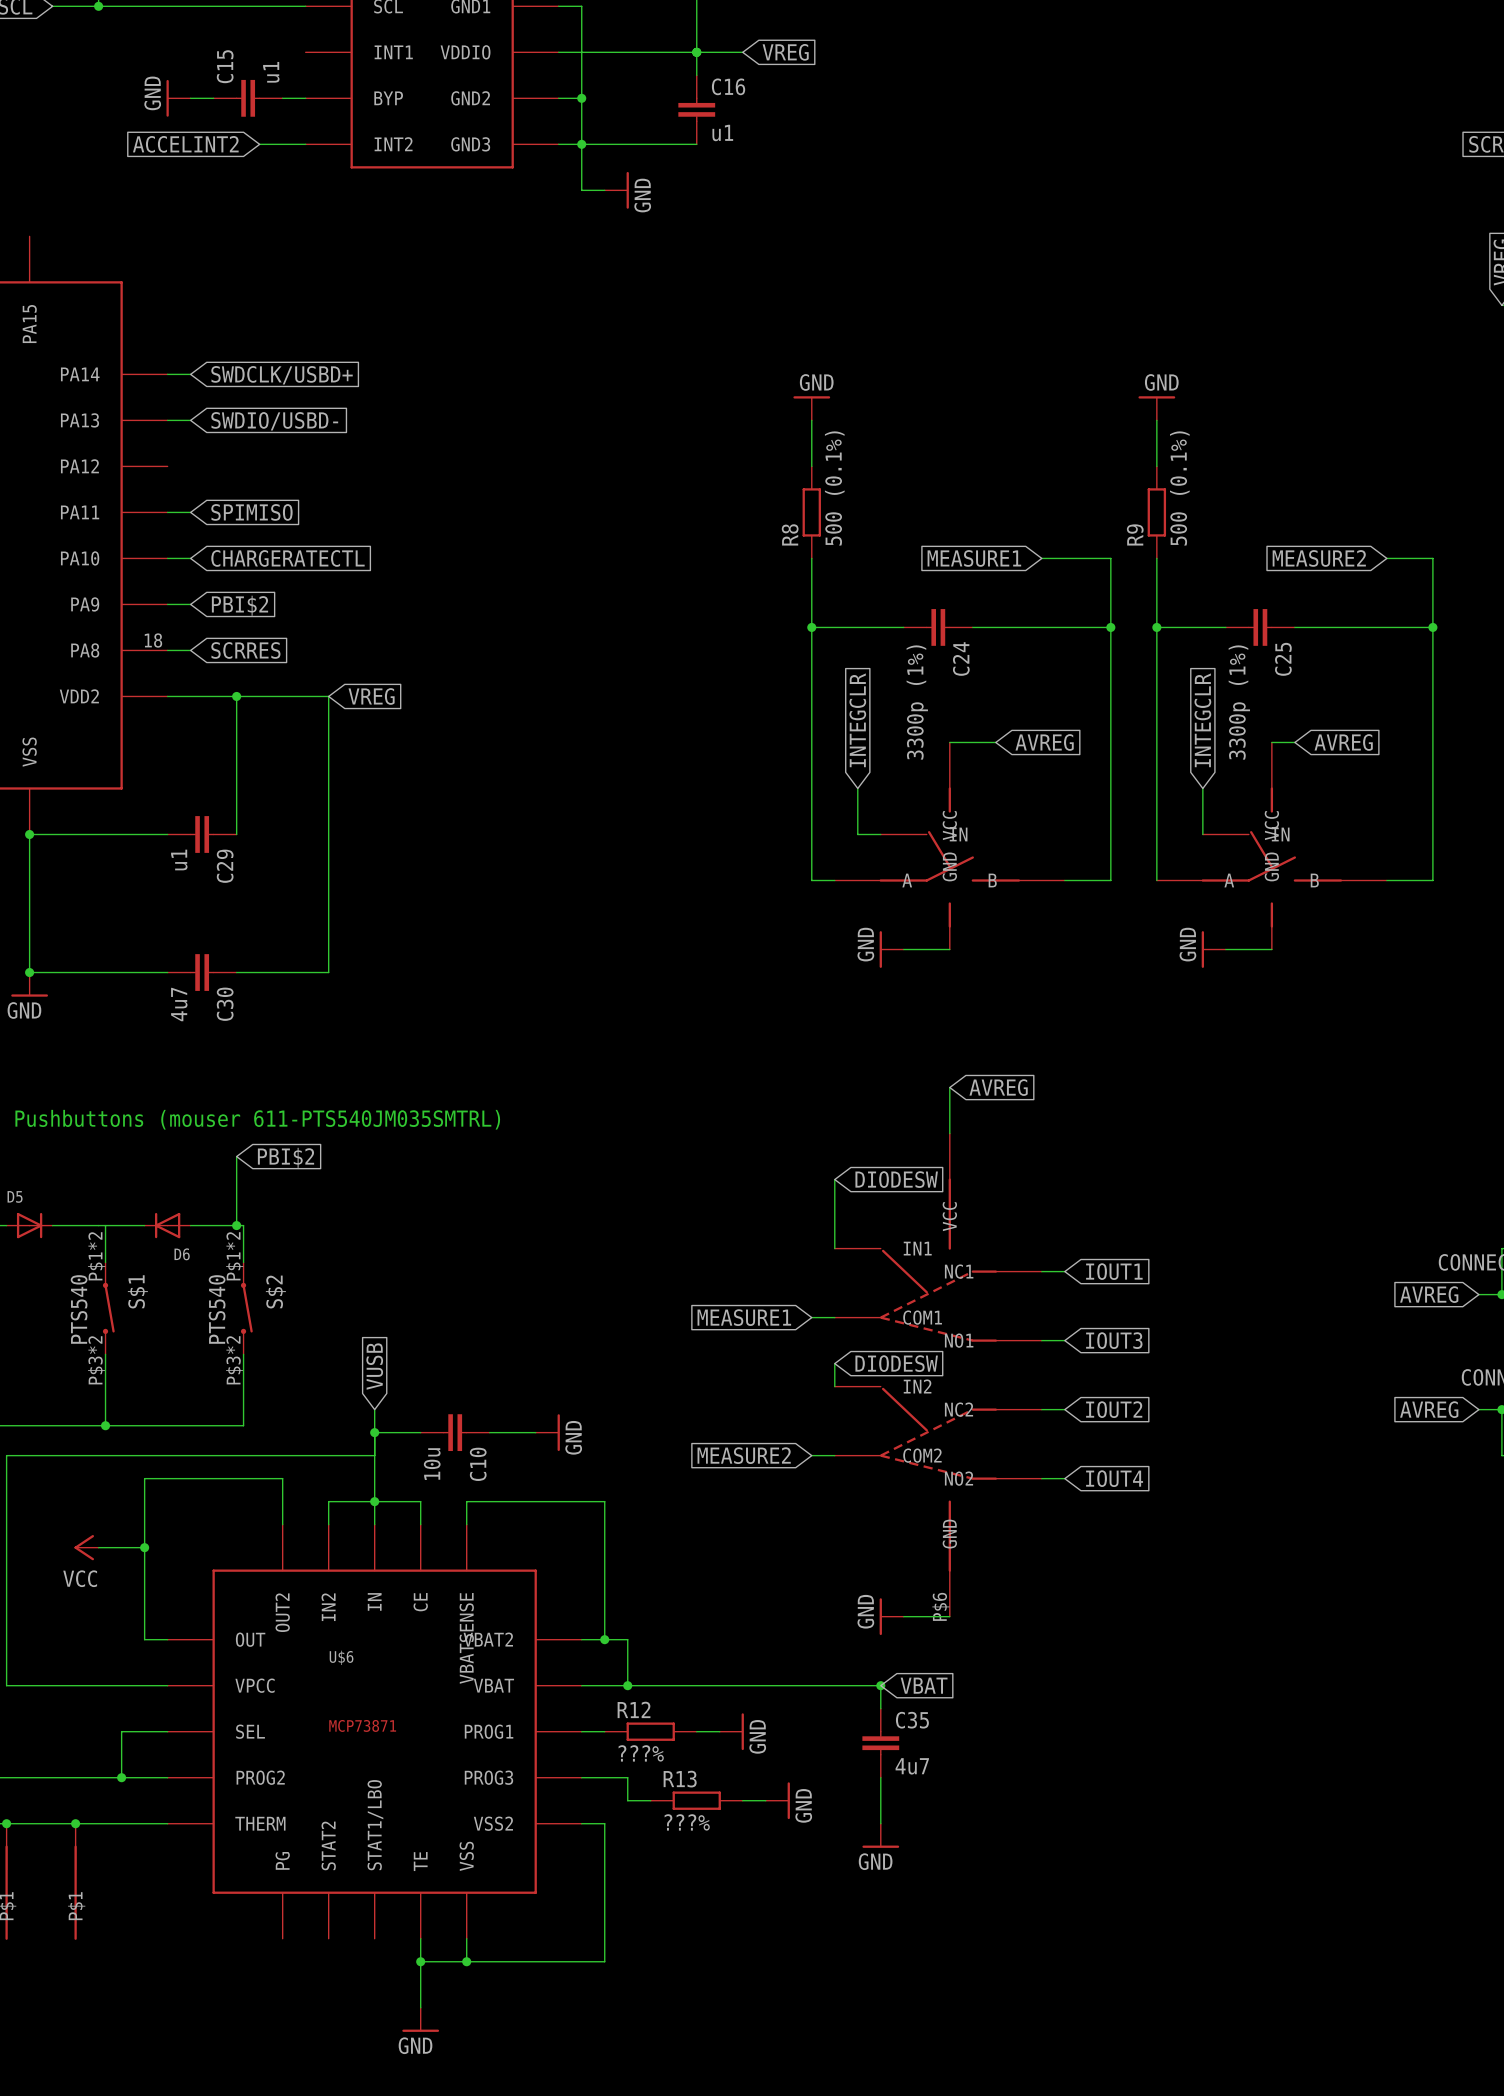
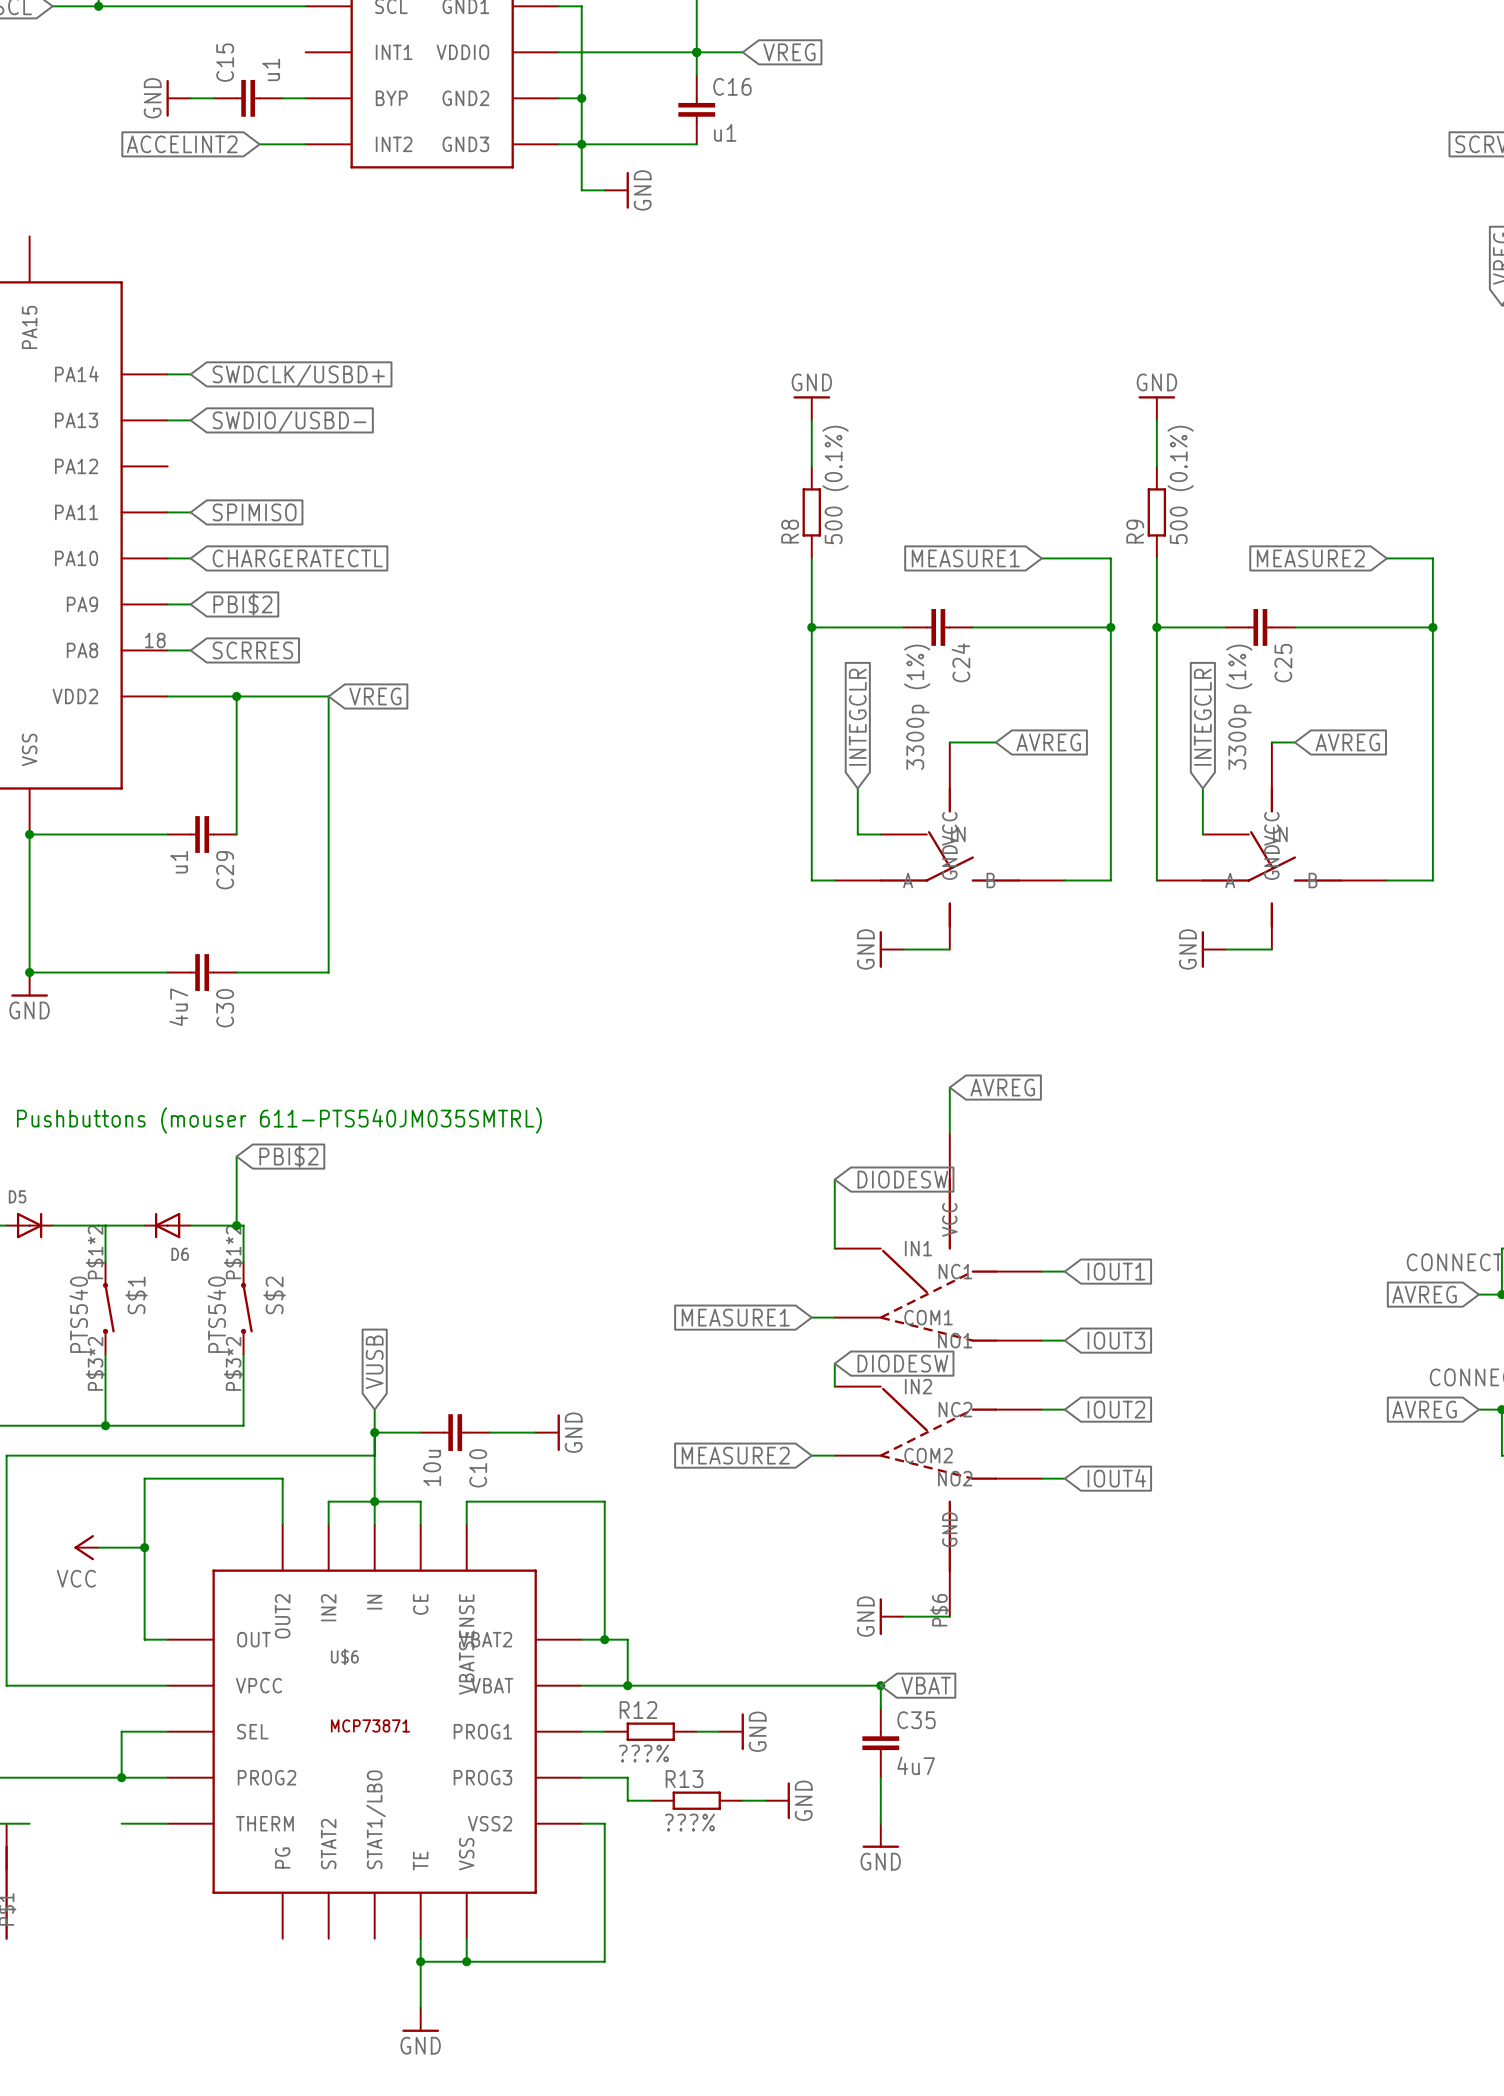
junction: (6, 1823) -> none
wire: (29, 1823) (121, 1823) -> none
junction: (75, 1823) -> none
part: (75, 1881) -> none

